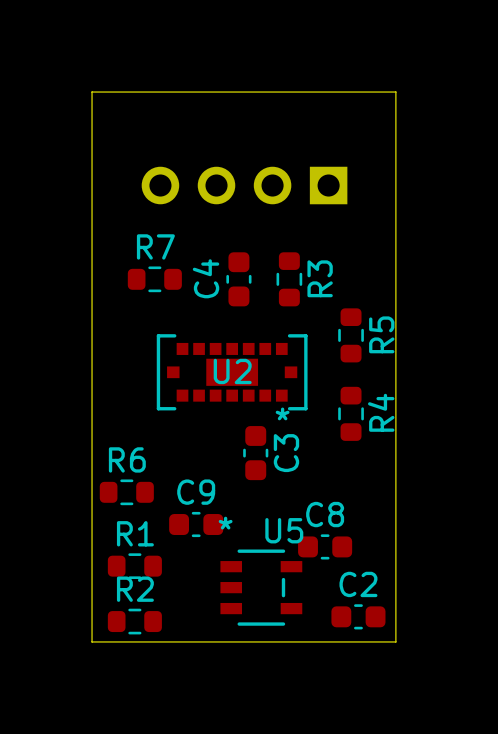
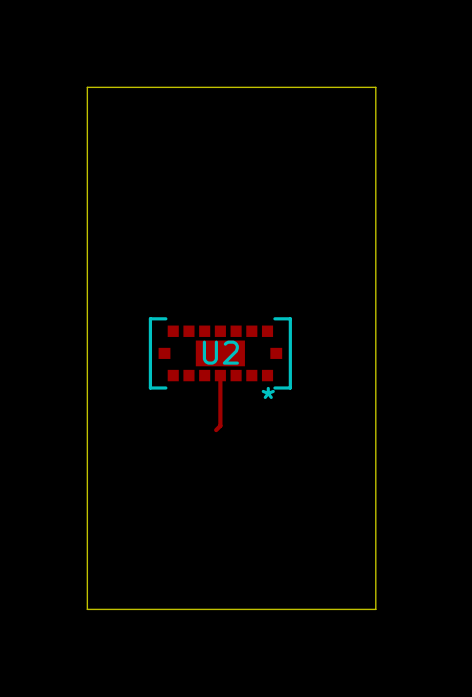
part: (244, 185) -> none
R7: (154, 279) -> none
C4: (238, 279) -> none
R3: (289, 279) -> none
R5: (351, 335) -> none
top track: none -> (220, 375) (220, 425) (216, 430)
R4: (351, 413) -> none
C3: (255, 453) -> none
R6: (126, 492) -> none
C9: (196, 524) -> none
C8: (325, 546) -> none
R1: (134, 566) -> none
U5: (261, 587) -> none
C2: (358, 616) -> none
R2: (134, 621) -> none

